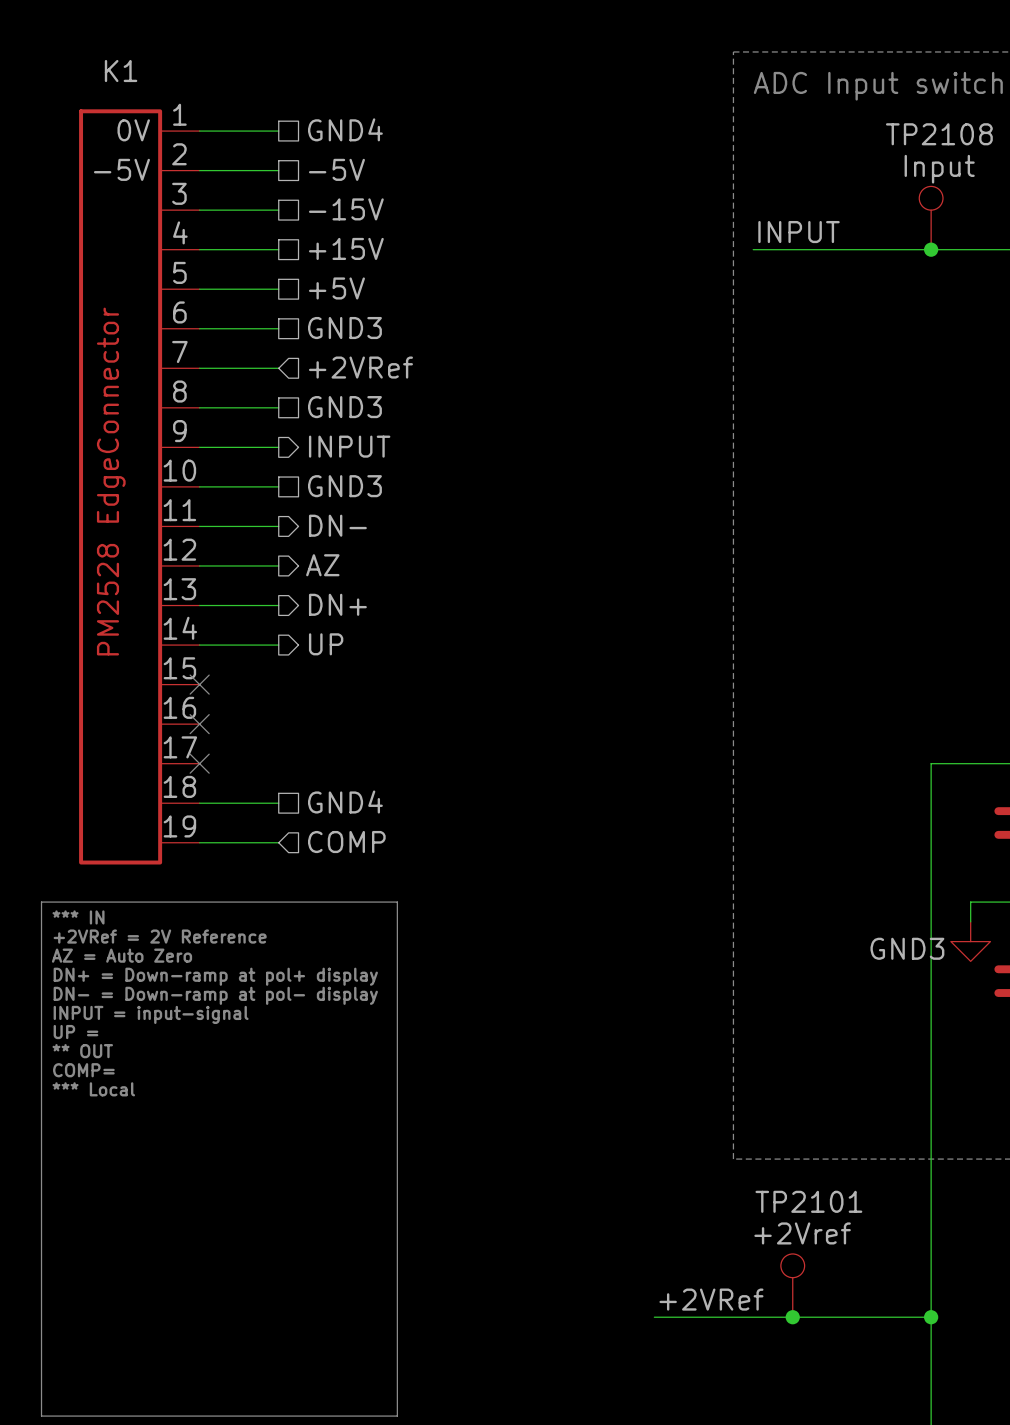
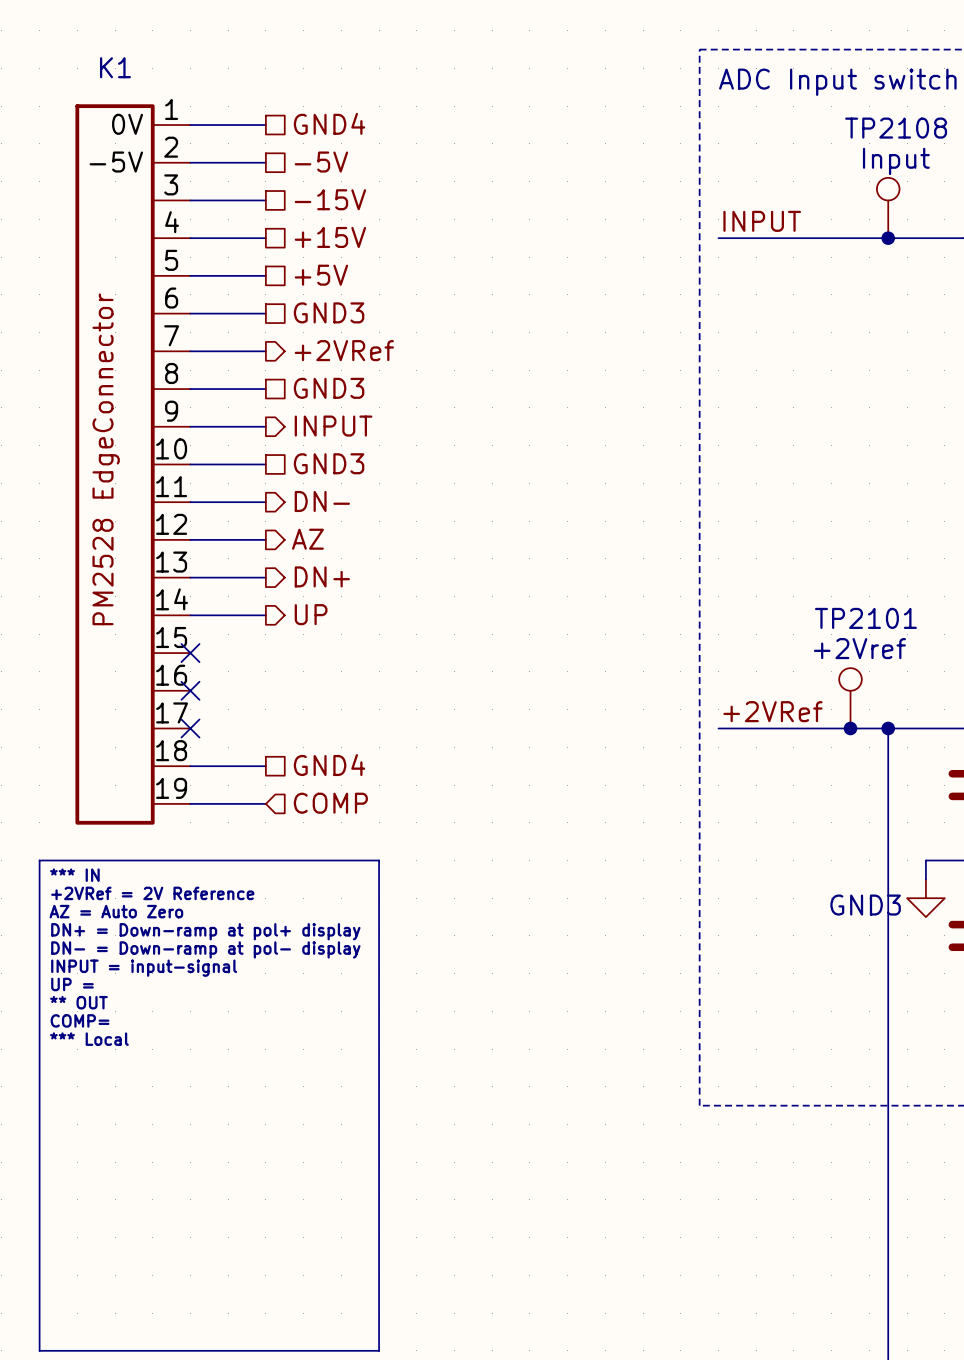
hierarchical label shape: input (360, 367) -> output (344, 350)
label: none -> +2VRef (772, 711)
wire: none -> (718, 728) (888, 728)
junction: none -> (850, 728)
junction: none -> (888, 728)
TP2101 position: (792, 1285) -> (850, 698)
label: +2VRef (711, 1299) -> none
wire: (654, 1317) (931, 1317) -> none
junction: (792, 1317) -> none
junction: (931, 1317) -> none

